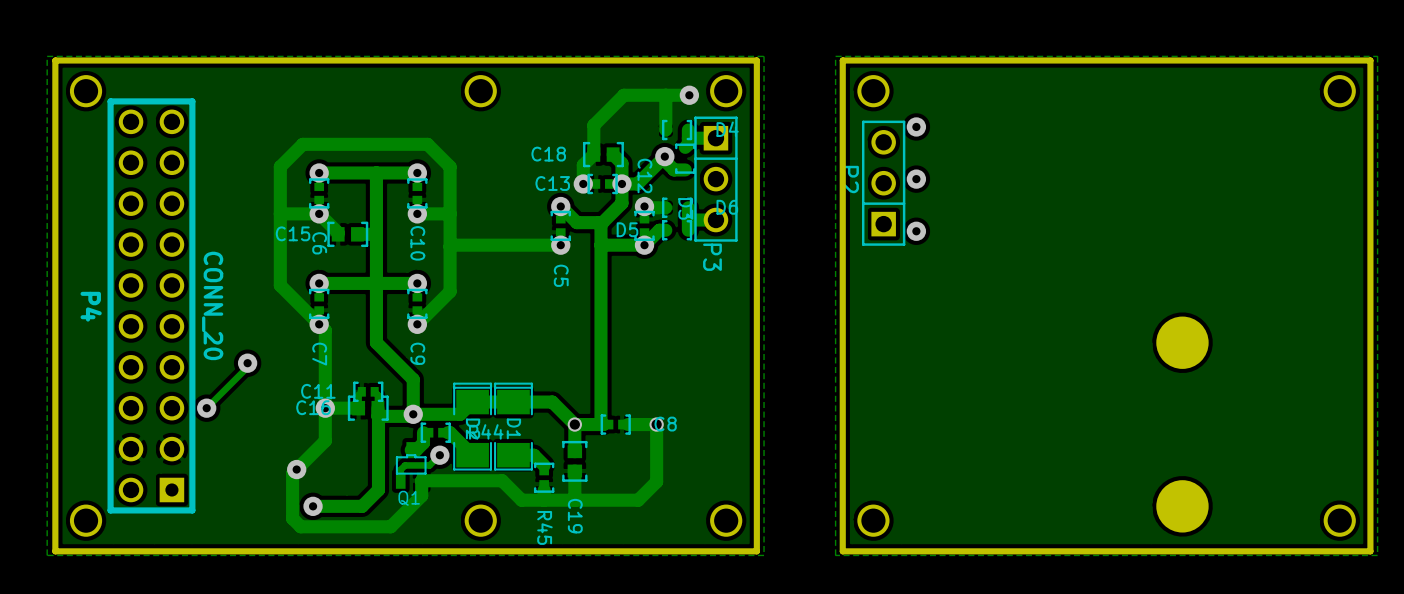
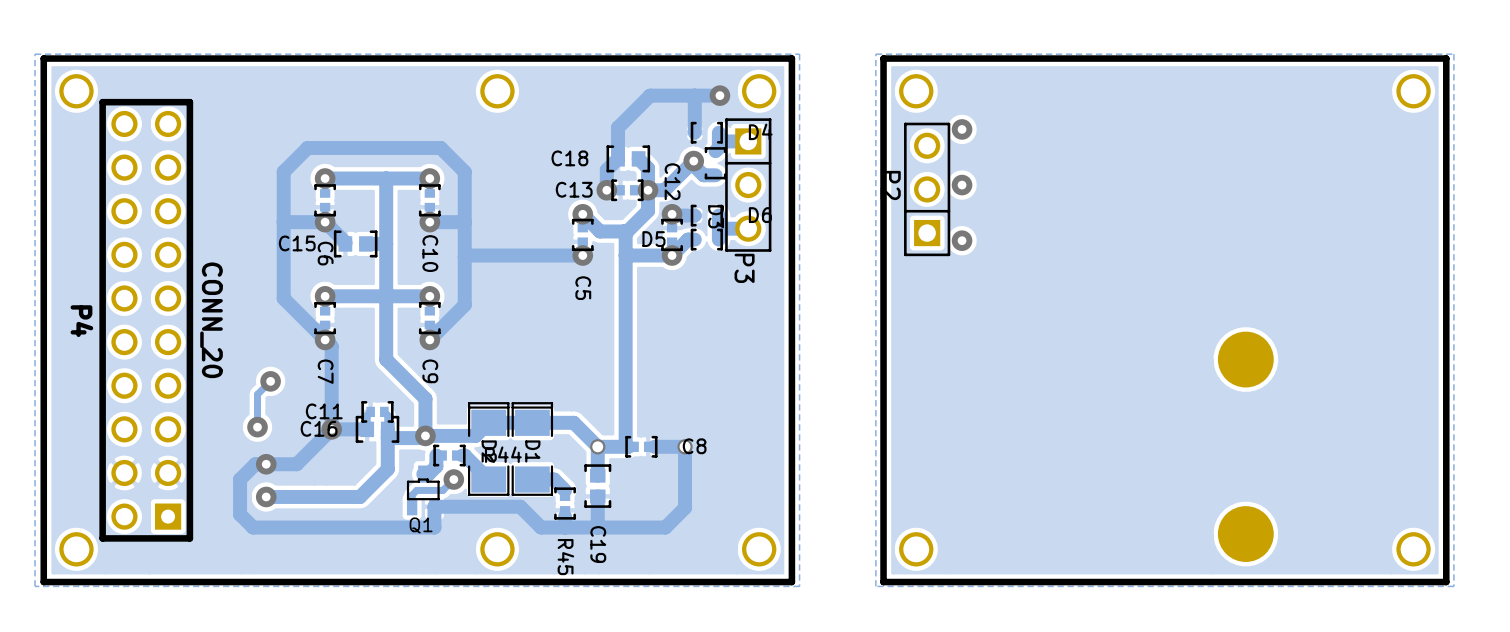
track: (247, 363) (247, 367) (206, 408) -> none
via position: (247, 363) -> (270, 381)
track: none -> (270, 381) (257, 394) (257, 427)
via: none -> (257, 427)
via: (206, 408) -> none
track: (325, 408) (325, 440) (292, 473) (292, 518) (300, 526) (390, 526) (421, 495) -> (331, 429) (296, 464) (255, 464) (240, 479) (240, 514) (253, 527) (434, 527) (434, 522)
track: (378, 416) (378, 489) (362, 506) (313, 506) -> (387, 438) (387, 469) (360, 496) (266, 496)
via: none -> (266, 464)
via: (296, 469) -> none
via: none -> (266, 496)
via: (313, 506) -> none

